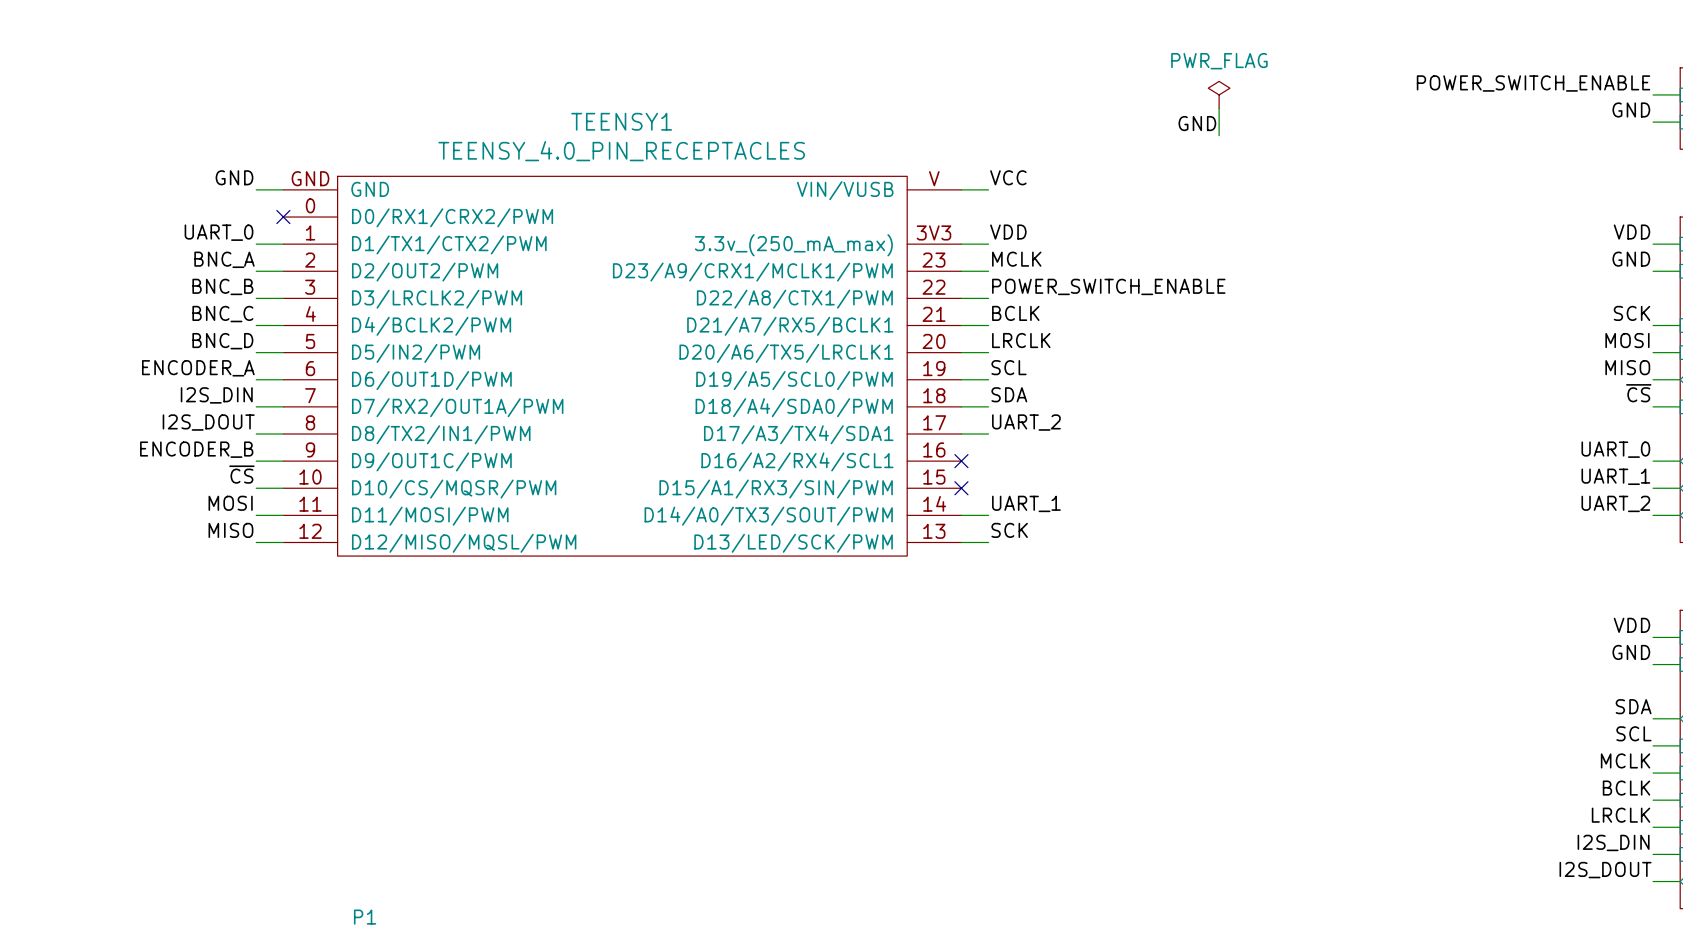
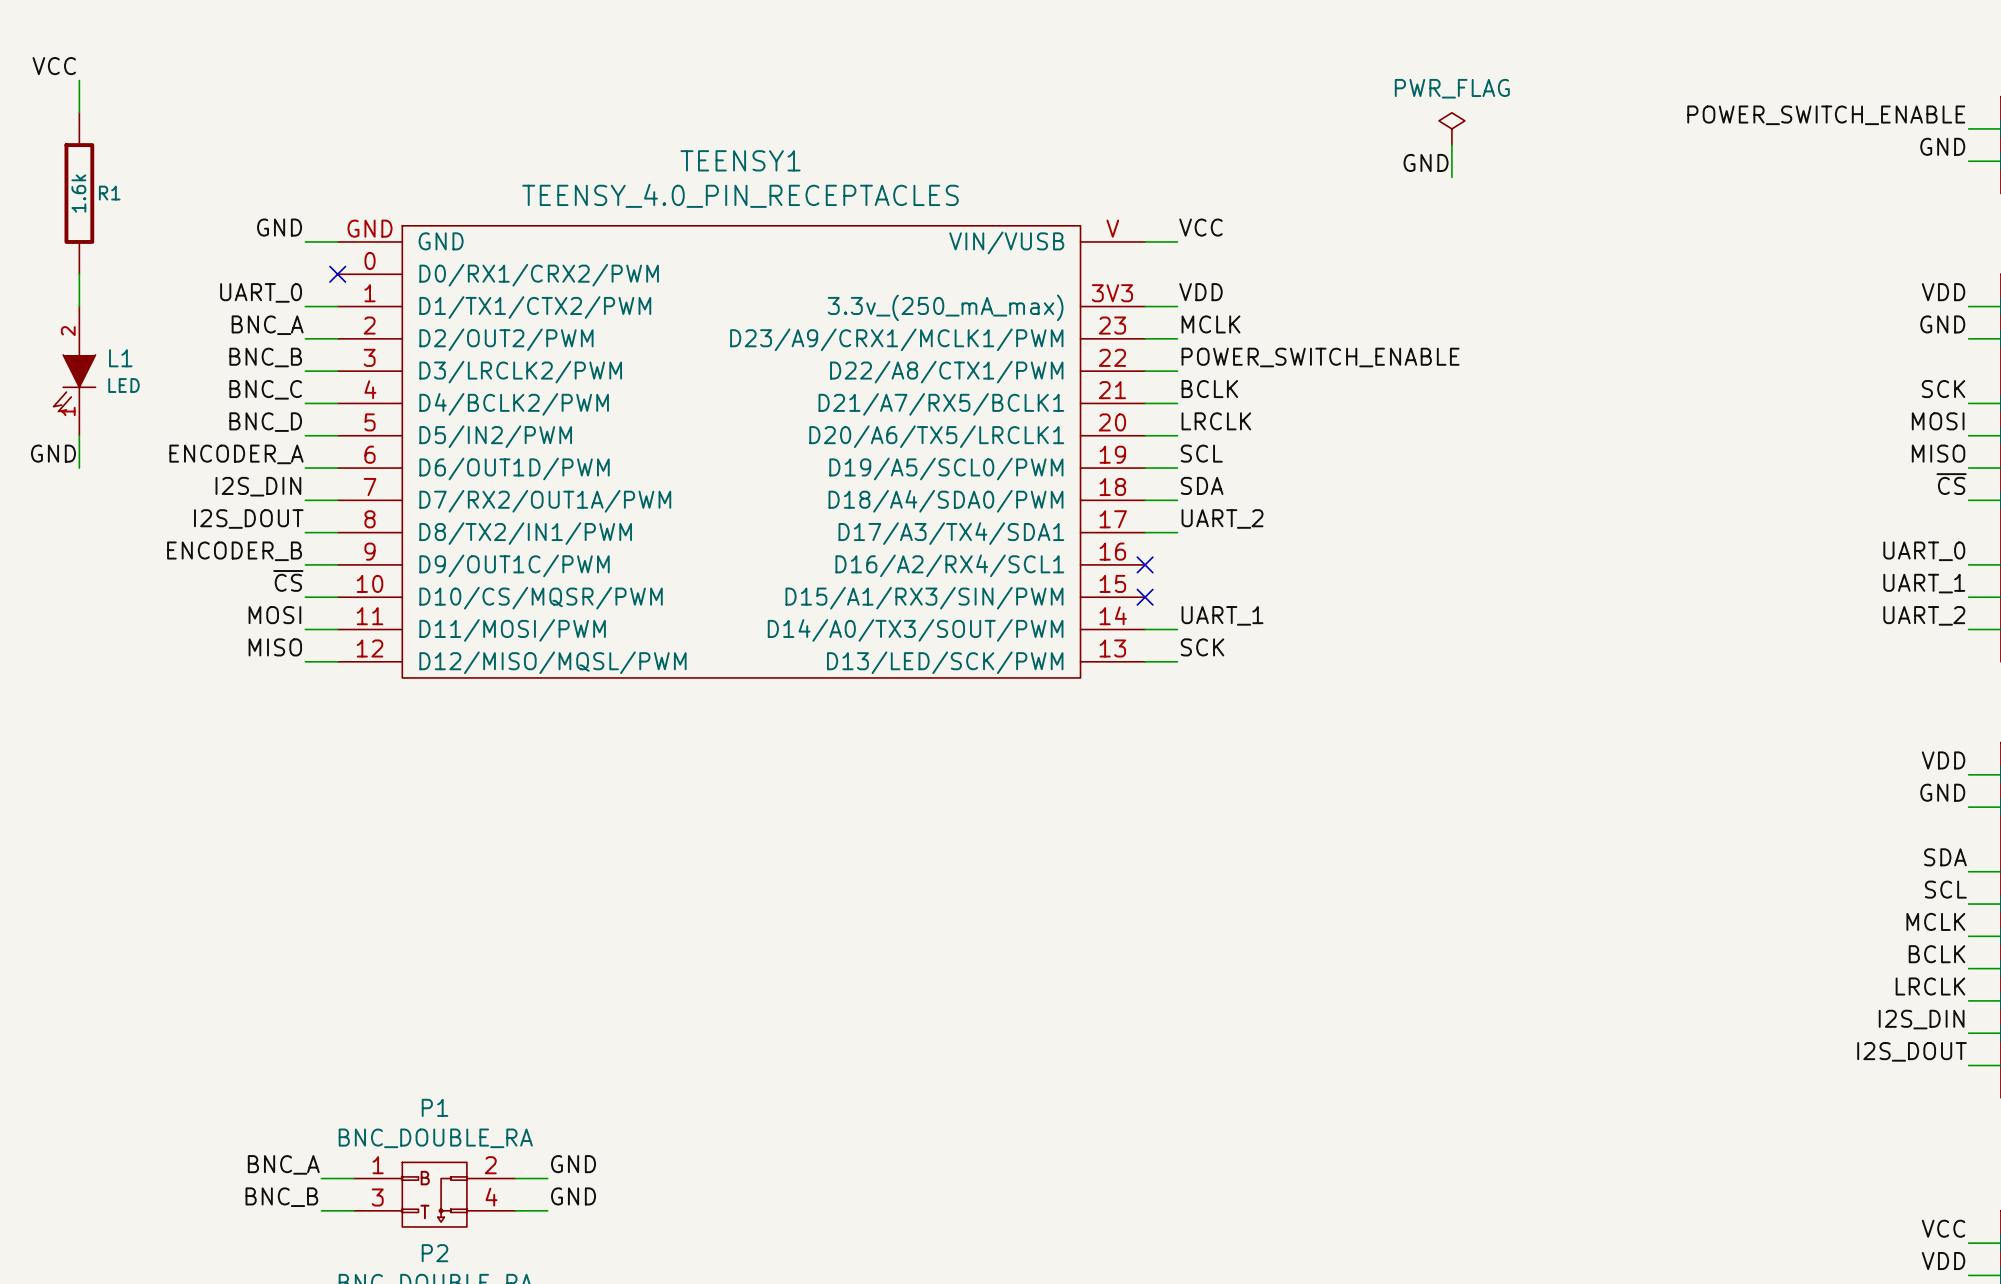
label: none -> VCC (54, 66)
wire: none -> (79, 80) (79, 112)
R1: none -> 1.6k (79, 193)
wire: none -> (79, 274) (79, 306)
L1: none -> LED (74, 371)
wire: none -> (79, 435) (79, 468)
label: none -> GND (53, 453)

